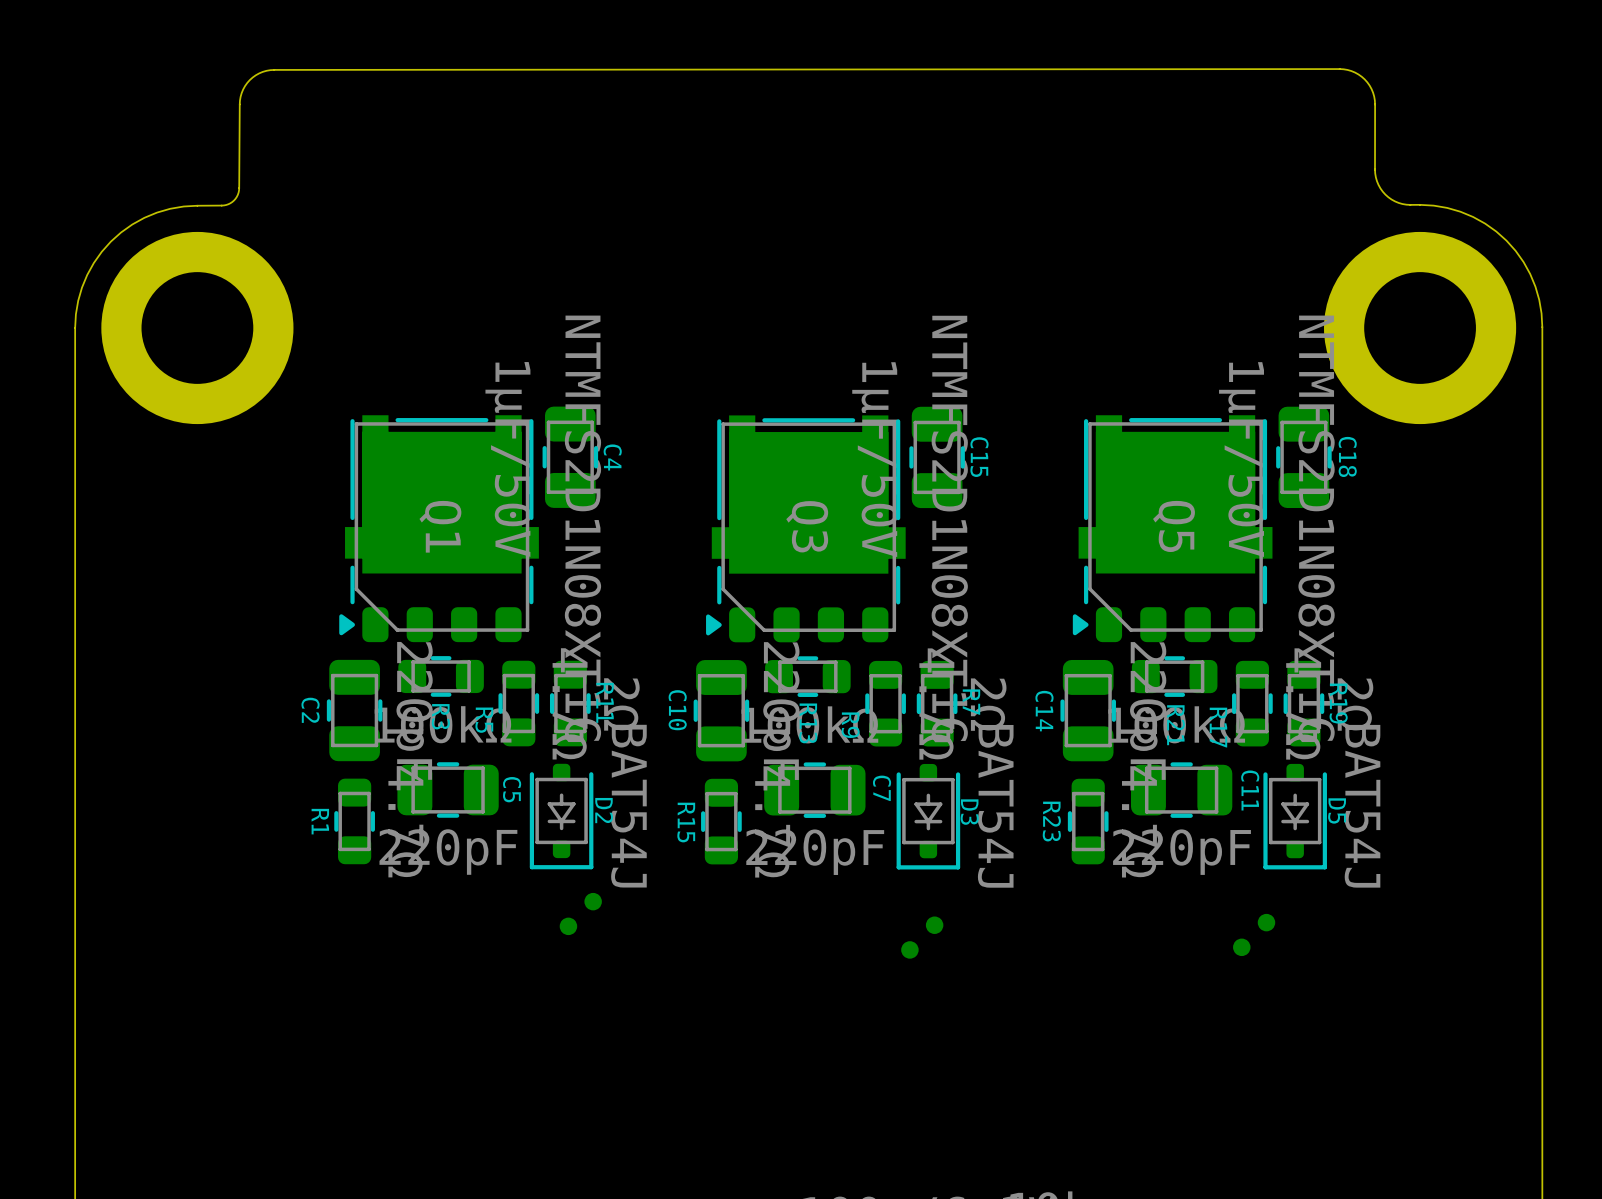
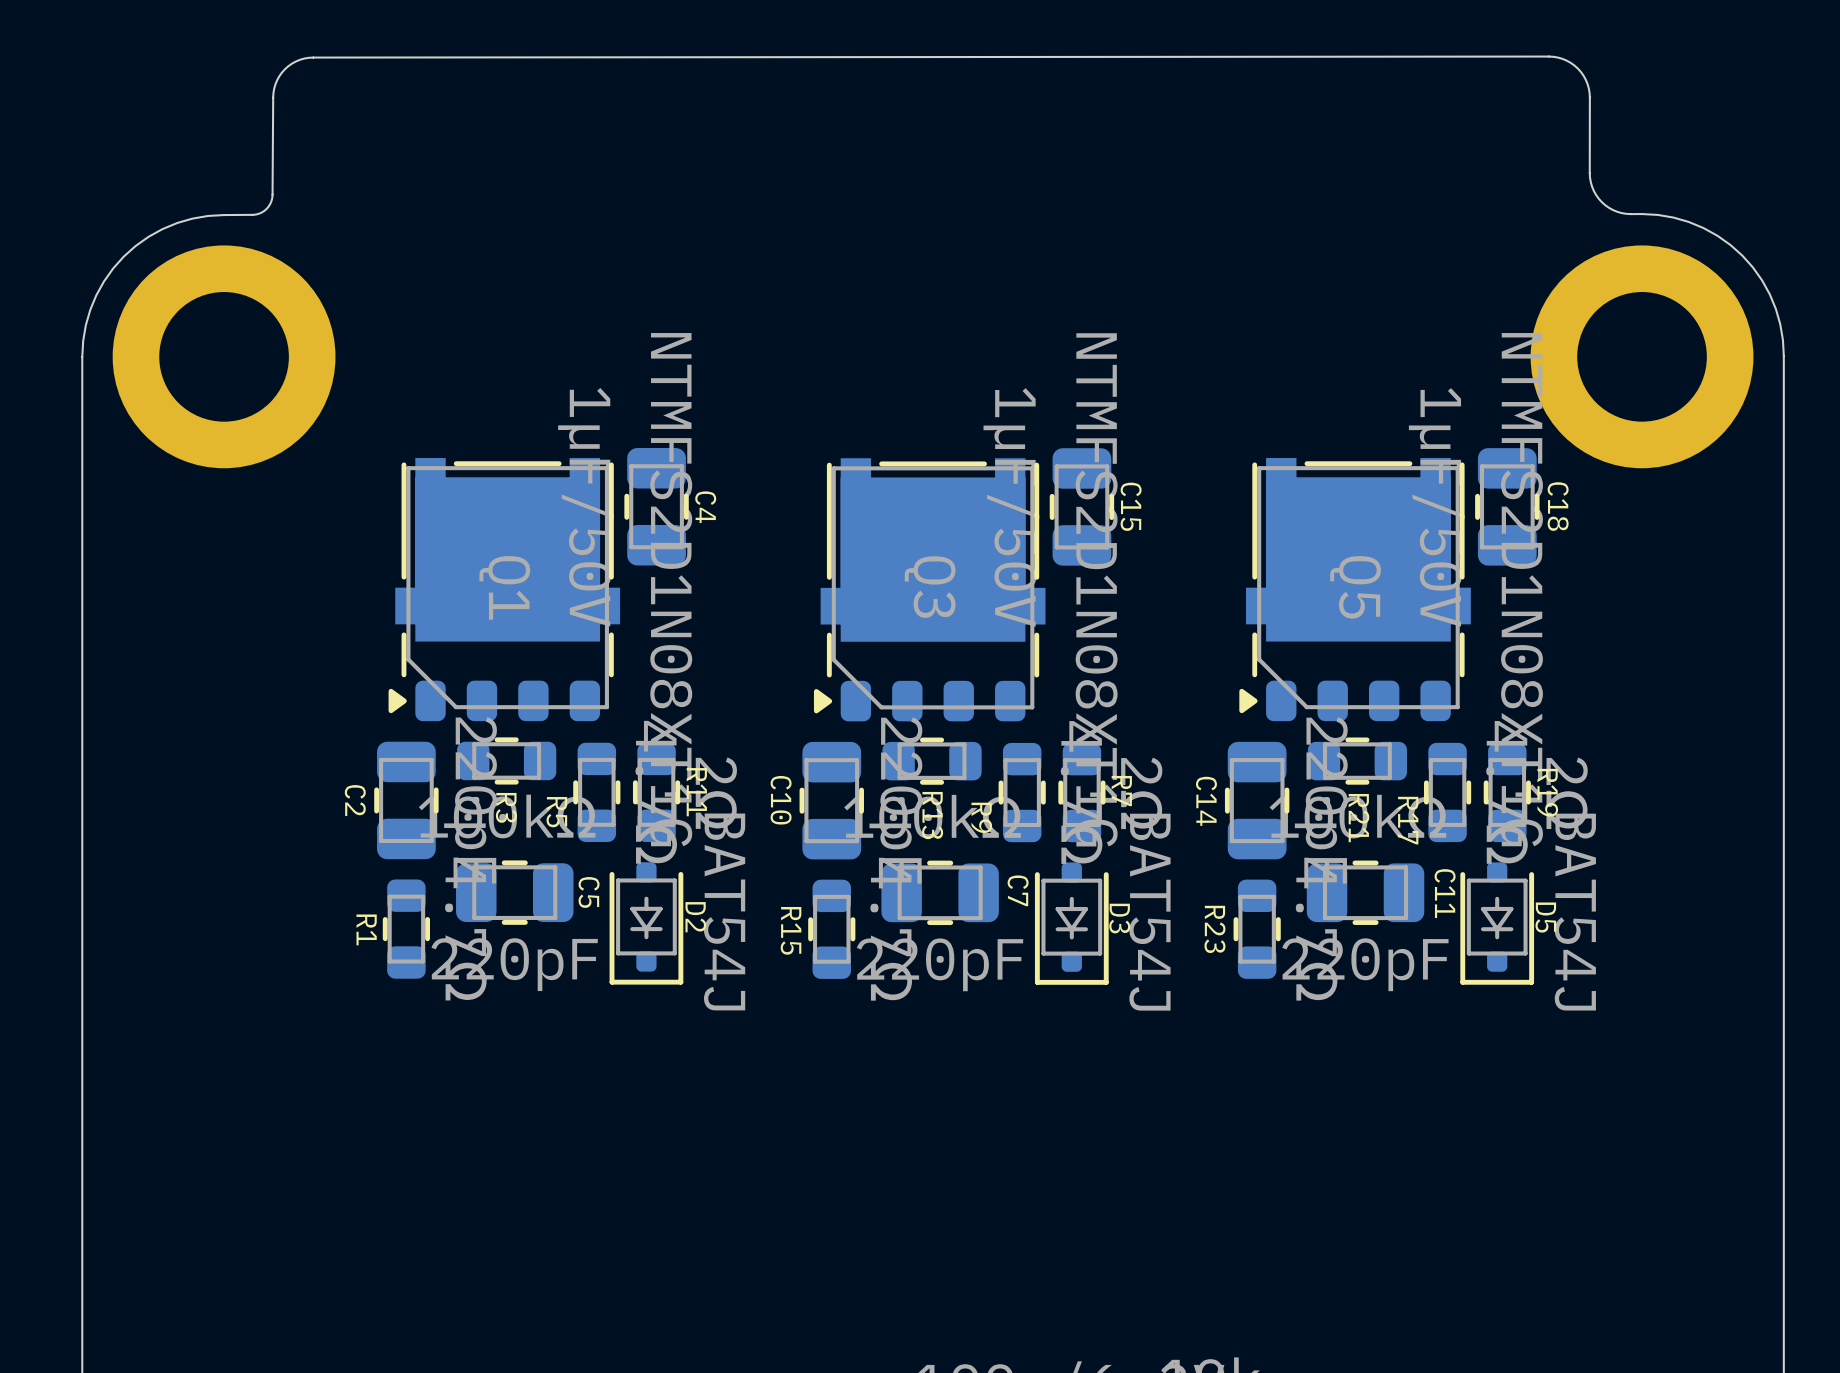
part: (580, 914) -> none
part: (1254, 934) -> none
part: (922, 937) -> none

